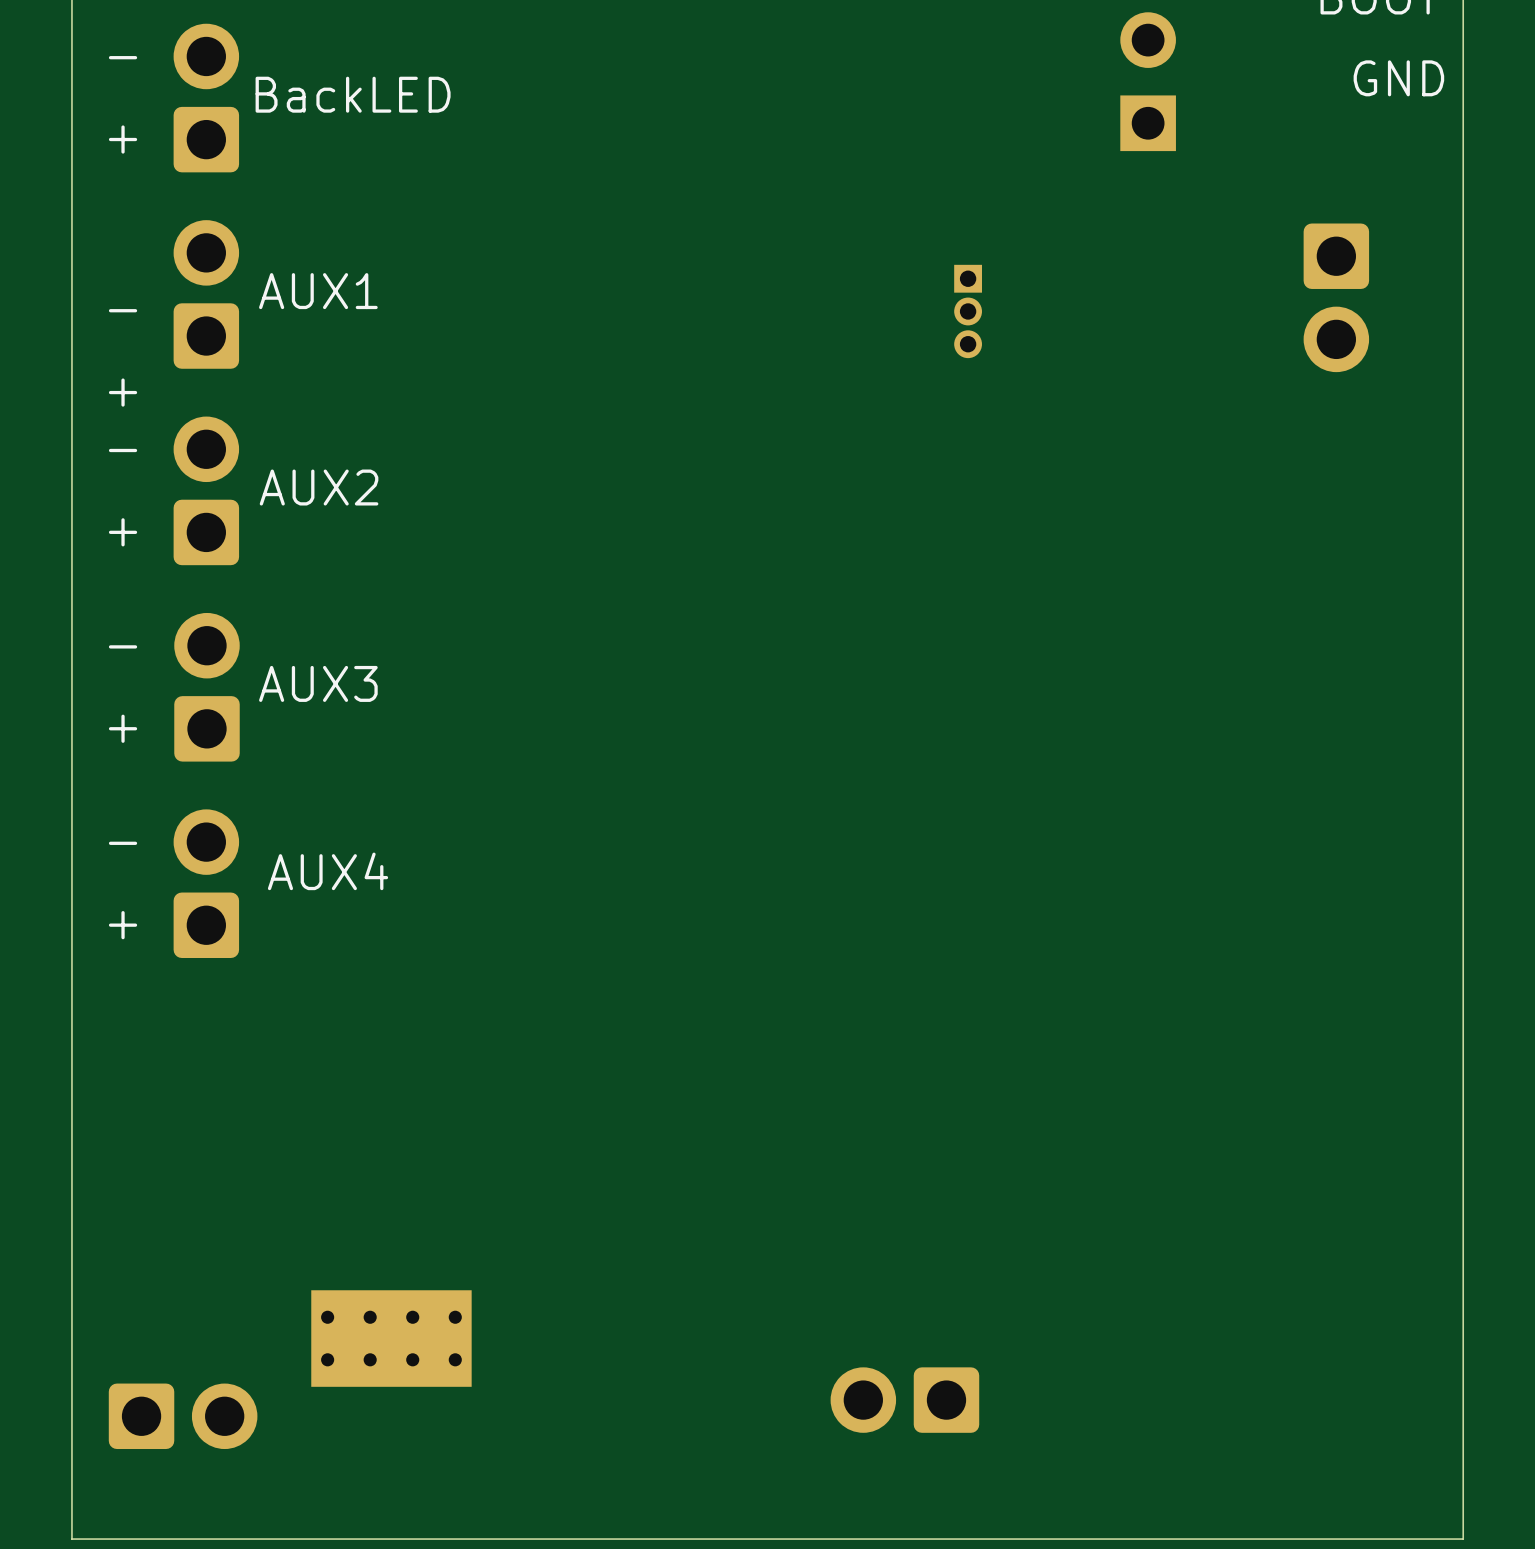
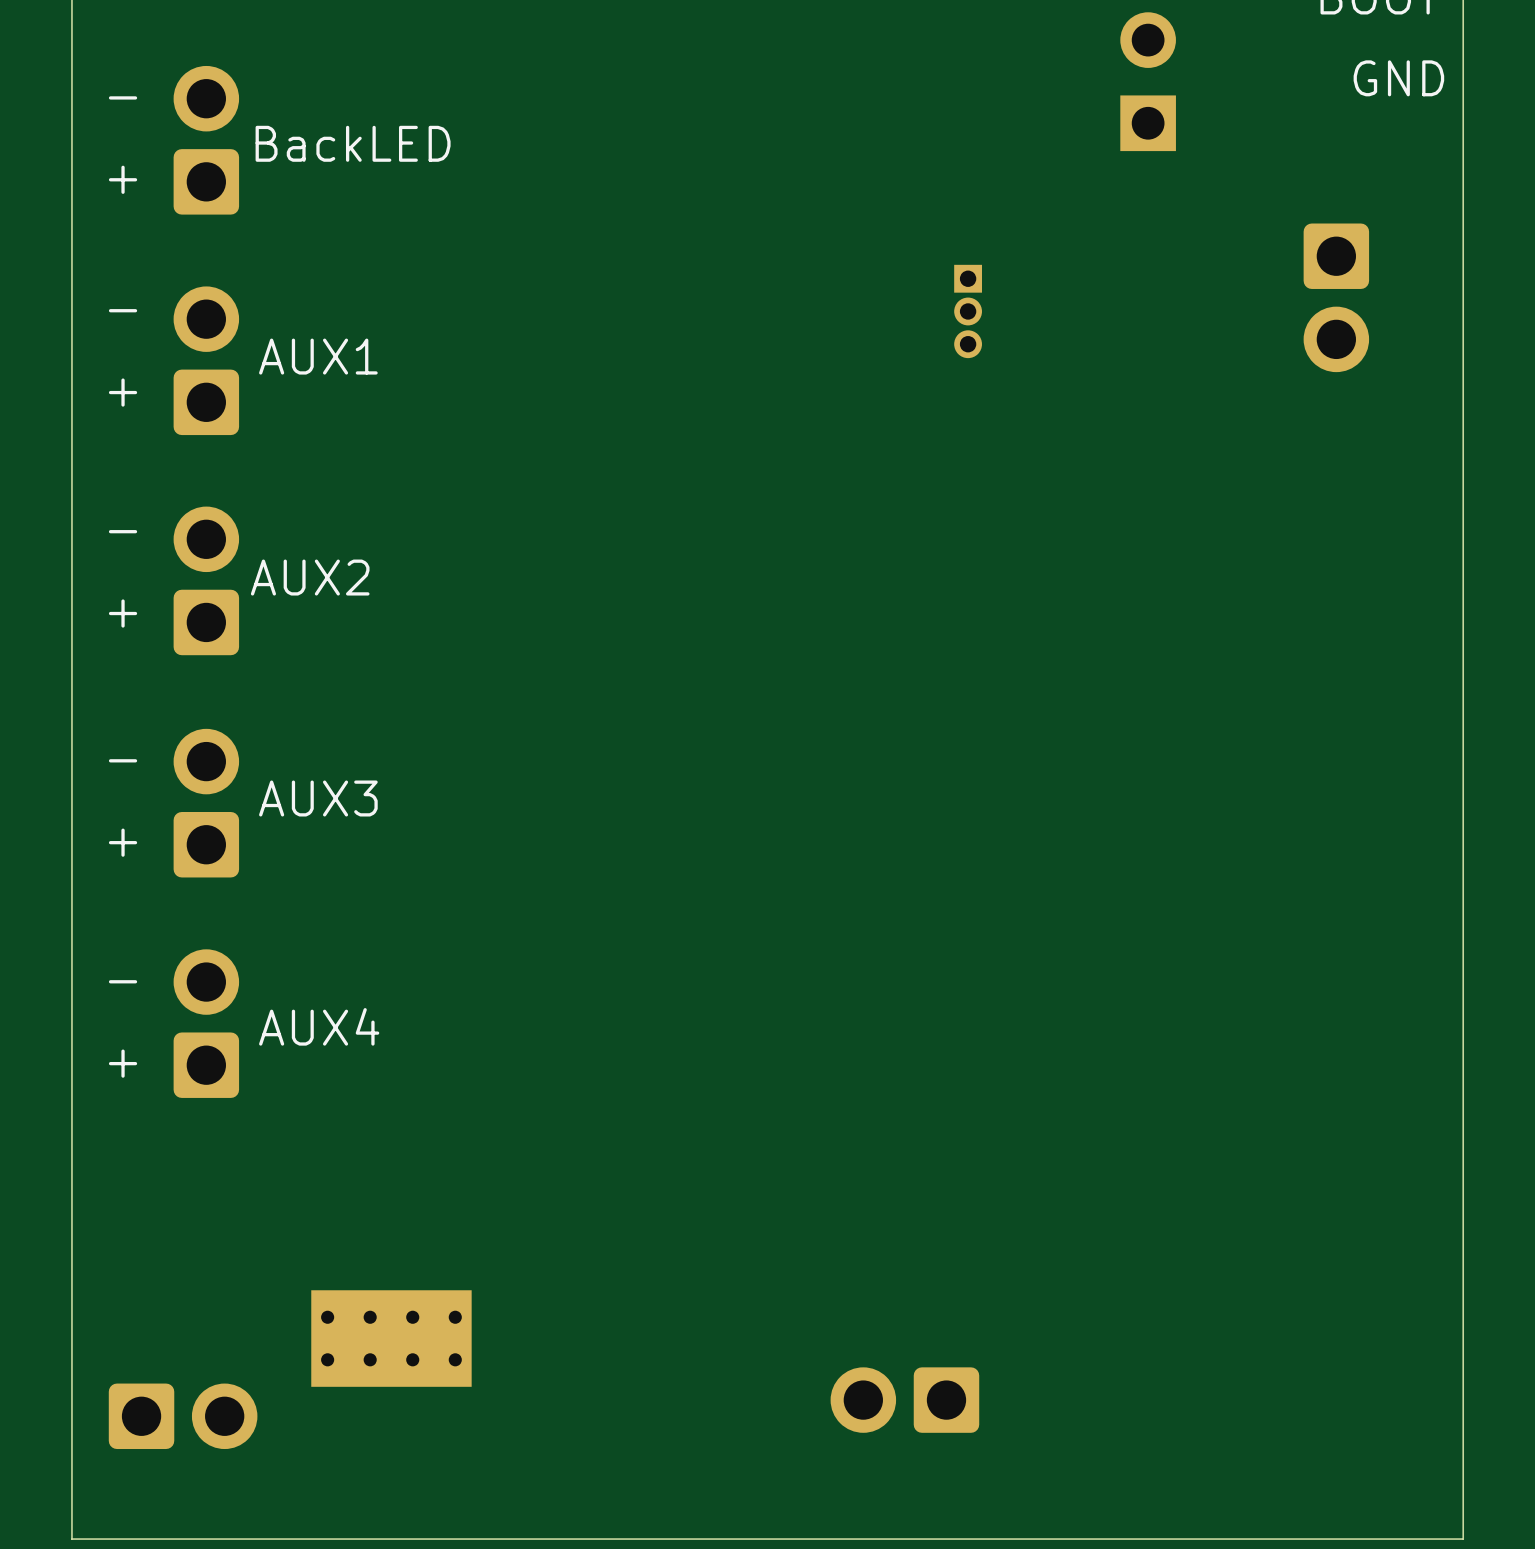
text position: - (123, 57) -> - (123, 97)
text position: BackLED (353, 94) -> BackLED (353, 143)
part position: (206, 98) -> (206, 140)
text position: + (123, 139) -> + (123, 179)
text position: AUX1 (318, 291) -> AUX1 (318, 356)
part: (206, 294) -> none
part: none -> (206, 360)
text: - (123, 450) -> none
text position: AUX2 (319, 487) -> AUX2 (310, 577)
part: (206, 490) -> none
text: + (123, 532) -> - (123, 531)
part: none -> (206, 580)
text position: - (123, 646) -> - (123, 760)
text position: AUX3 (318, 683) -> AUX3 (318, 798)
part: (207, 687) -> none
text position: + (123, 728) -> + (123, 613)
part: none -> (206, 803)
text: - (123, 843) -> + (123, 842)
text position: AUX4 (328, 871) -> AUX4 (319, 1026)
part: (206, 883) -> none
text position: + (123, 925) -> + (123, 1063)
text: none -> - (123, 981)
part: none -> (206, 1023)

